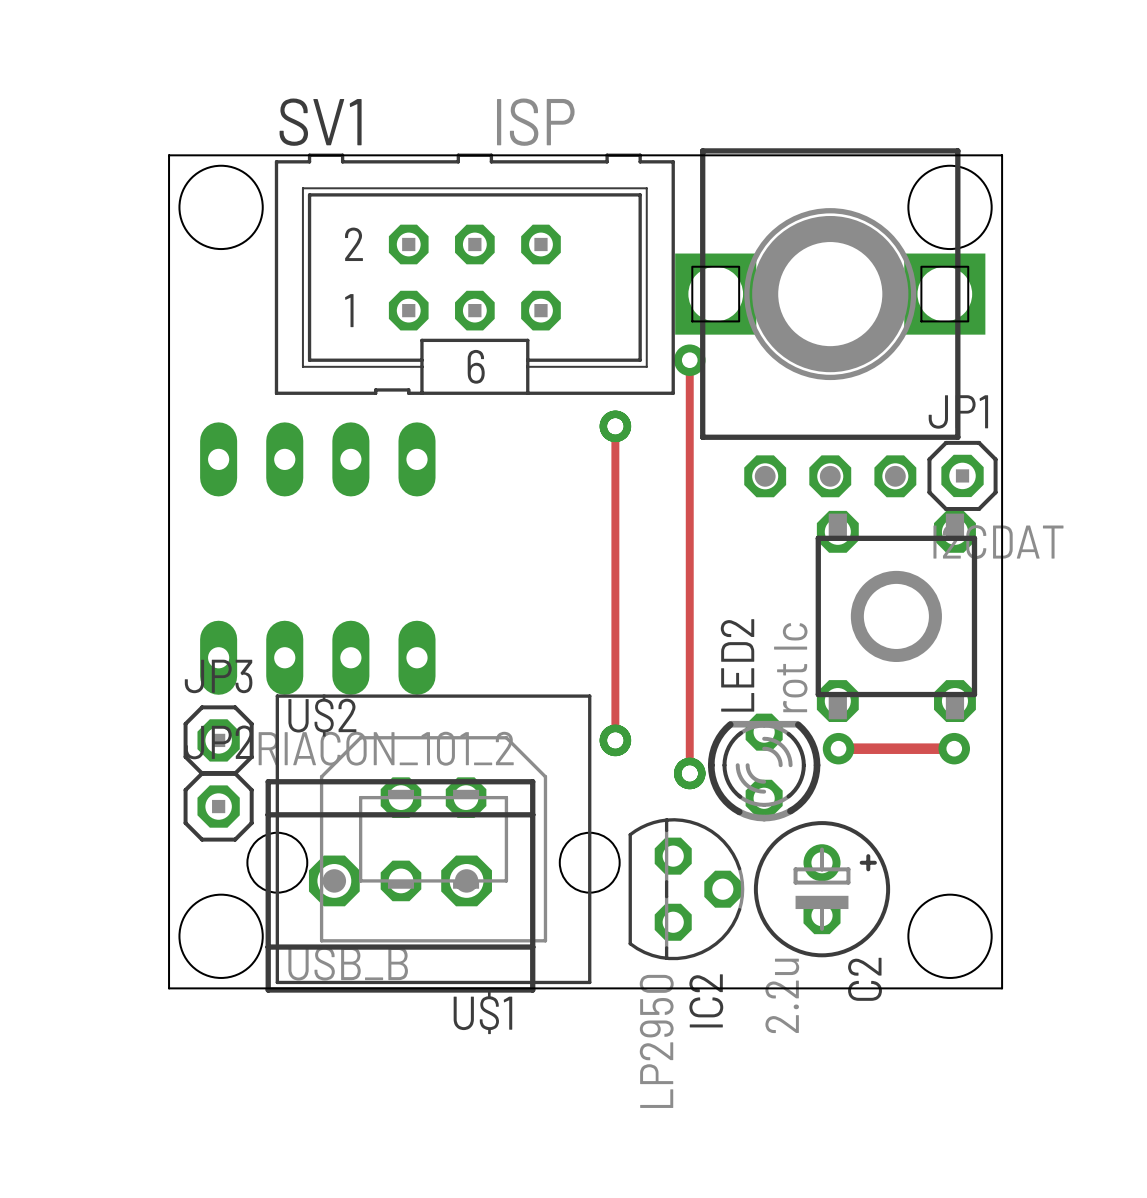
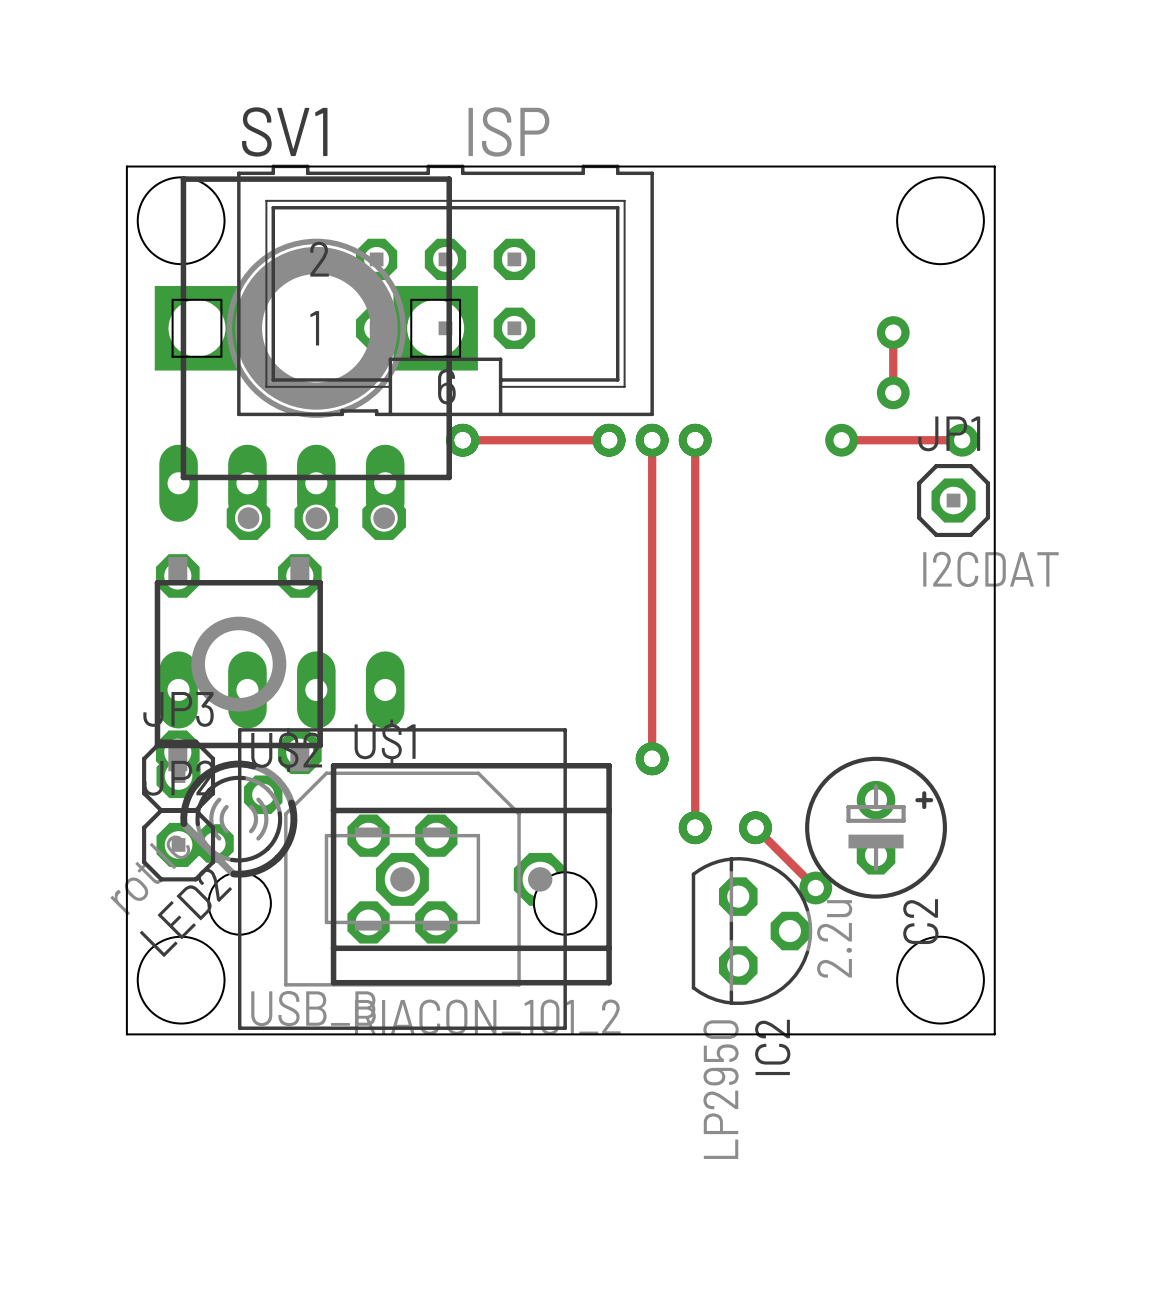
track: none -> (893, 332) (893, 392)
via: none -> (893, 332)
part position: (830, 322) -> (316, 358)
track: (689, 360) (689, 773) -> none
via: (689, 360) -> none
via: none -> (893, 392)
track: none -> (462, 440) (609, 440)
via: none -> (462, 440)
track: none -> (652, 440) (652, 758)
via: none -> (652, 440)
track: none -> (695, 440) (695, 827)
via: none -> (695, 440)
via: none -> (841, 440)
via: none -> (962, 440)
track: (615, 426) (615, 740) -> none
via position: (615, 426) -> (609, 440)
part position: (896, 616) -> (238, 664)
via: none -> (652, 758)
via: (615, 740) -> none
track: (838, 748) (954, 748) -> (841, 440) (962, 440)
via: (838, 748) -> none
via: (954, 748) -> none
LED2 rotation: 0° (764, 767) -> 135° counterclockwise (238, 819)
LED2 position: (764, 767) -> (238, 819)
via: (689, 773) -> none
via: none -> (695, 827)
track: none -> (755, 827) (815, 887)
via: none -> (755, 827)
via: none -> (815, 887)
U$1 rotation: 0° (400, 885) -> 180° (471, 874)
IC2 position: (686, 889) -> (752, 930)
C2 position: (822, 889) -> (876, 827)

